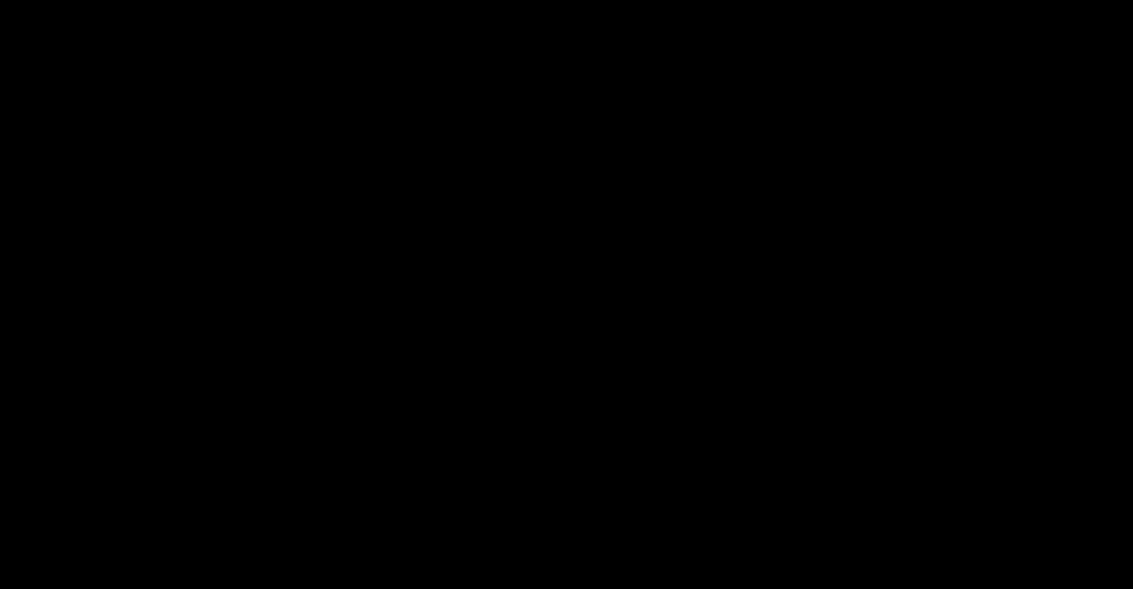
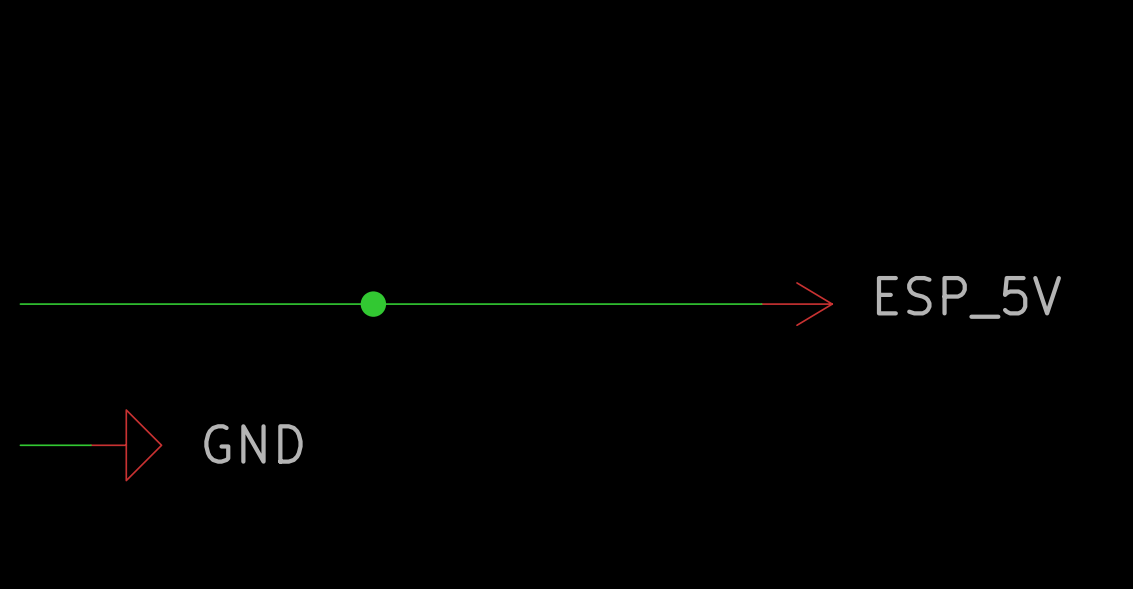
wire: none -> (20, 304) (761, 304)
junction: none -> (373, 304)
power symbol: none -> ESP_5V (796, 304)
wire: none -> (20, 445) (90, 445)
power symbol: none -> GND (126, 445)

